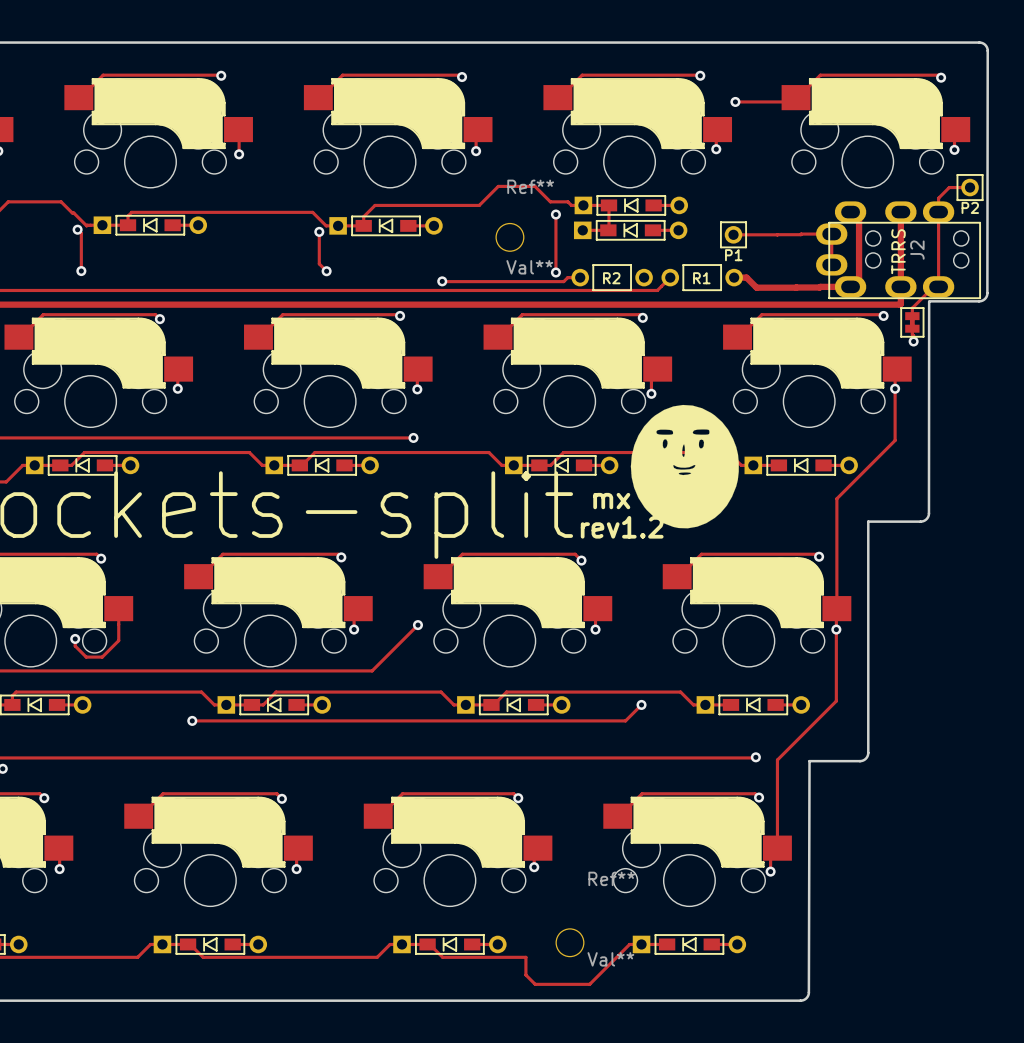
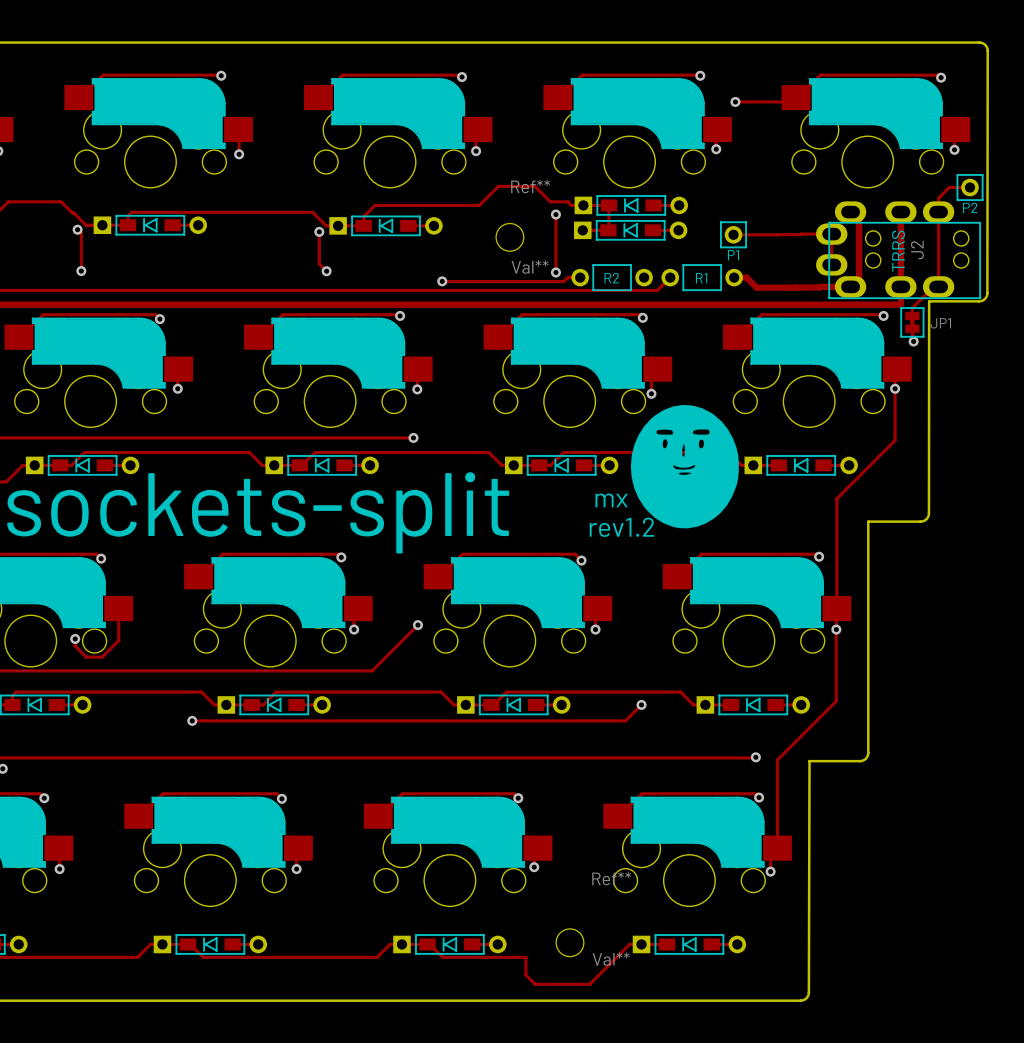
JP1 name: none -> JP1 (940, 323)

